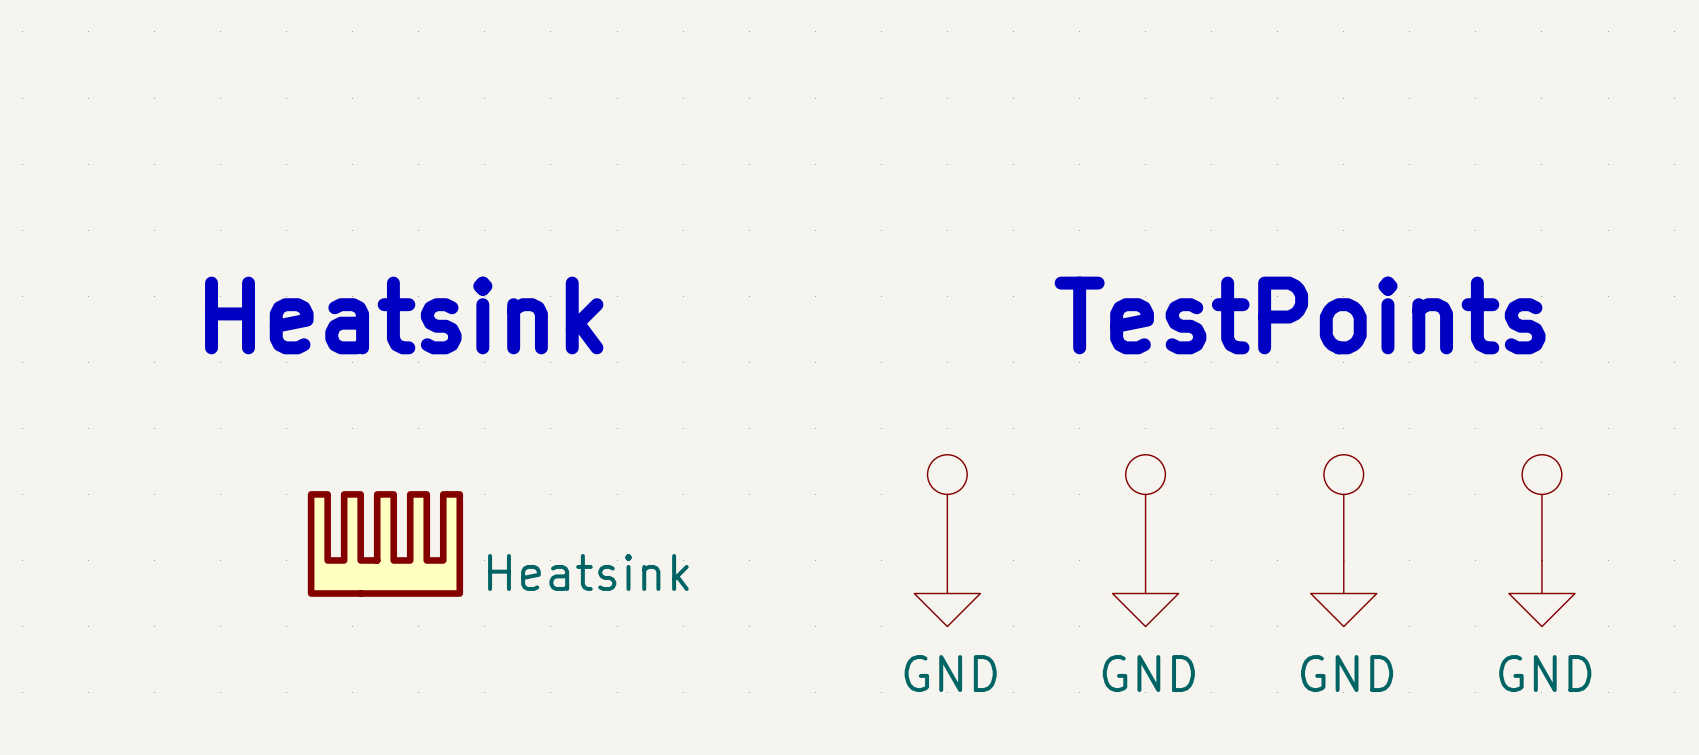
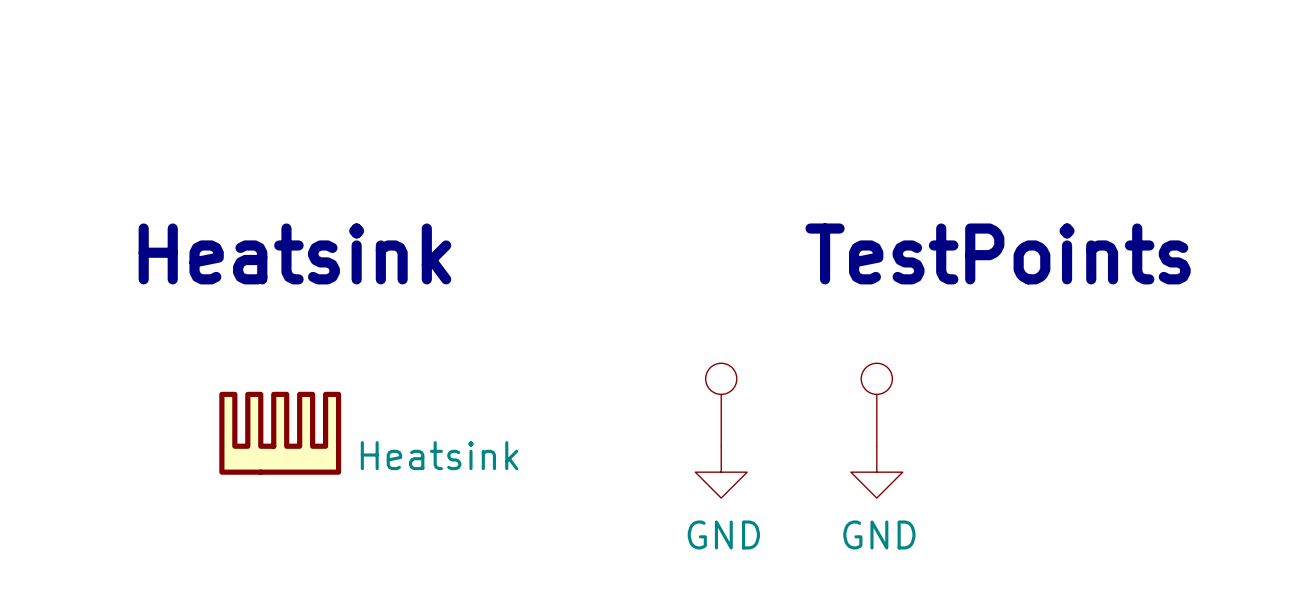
part: (1343, 507) -> none
part: (1541, 507) -> none
power symbol: GND (1343, 593) -> none
power symbol: GND (1541, 593) -> none

